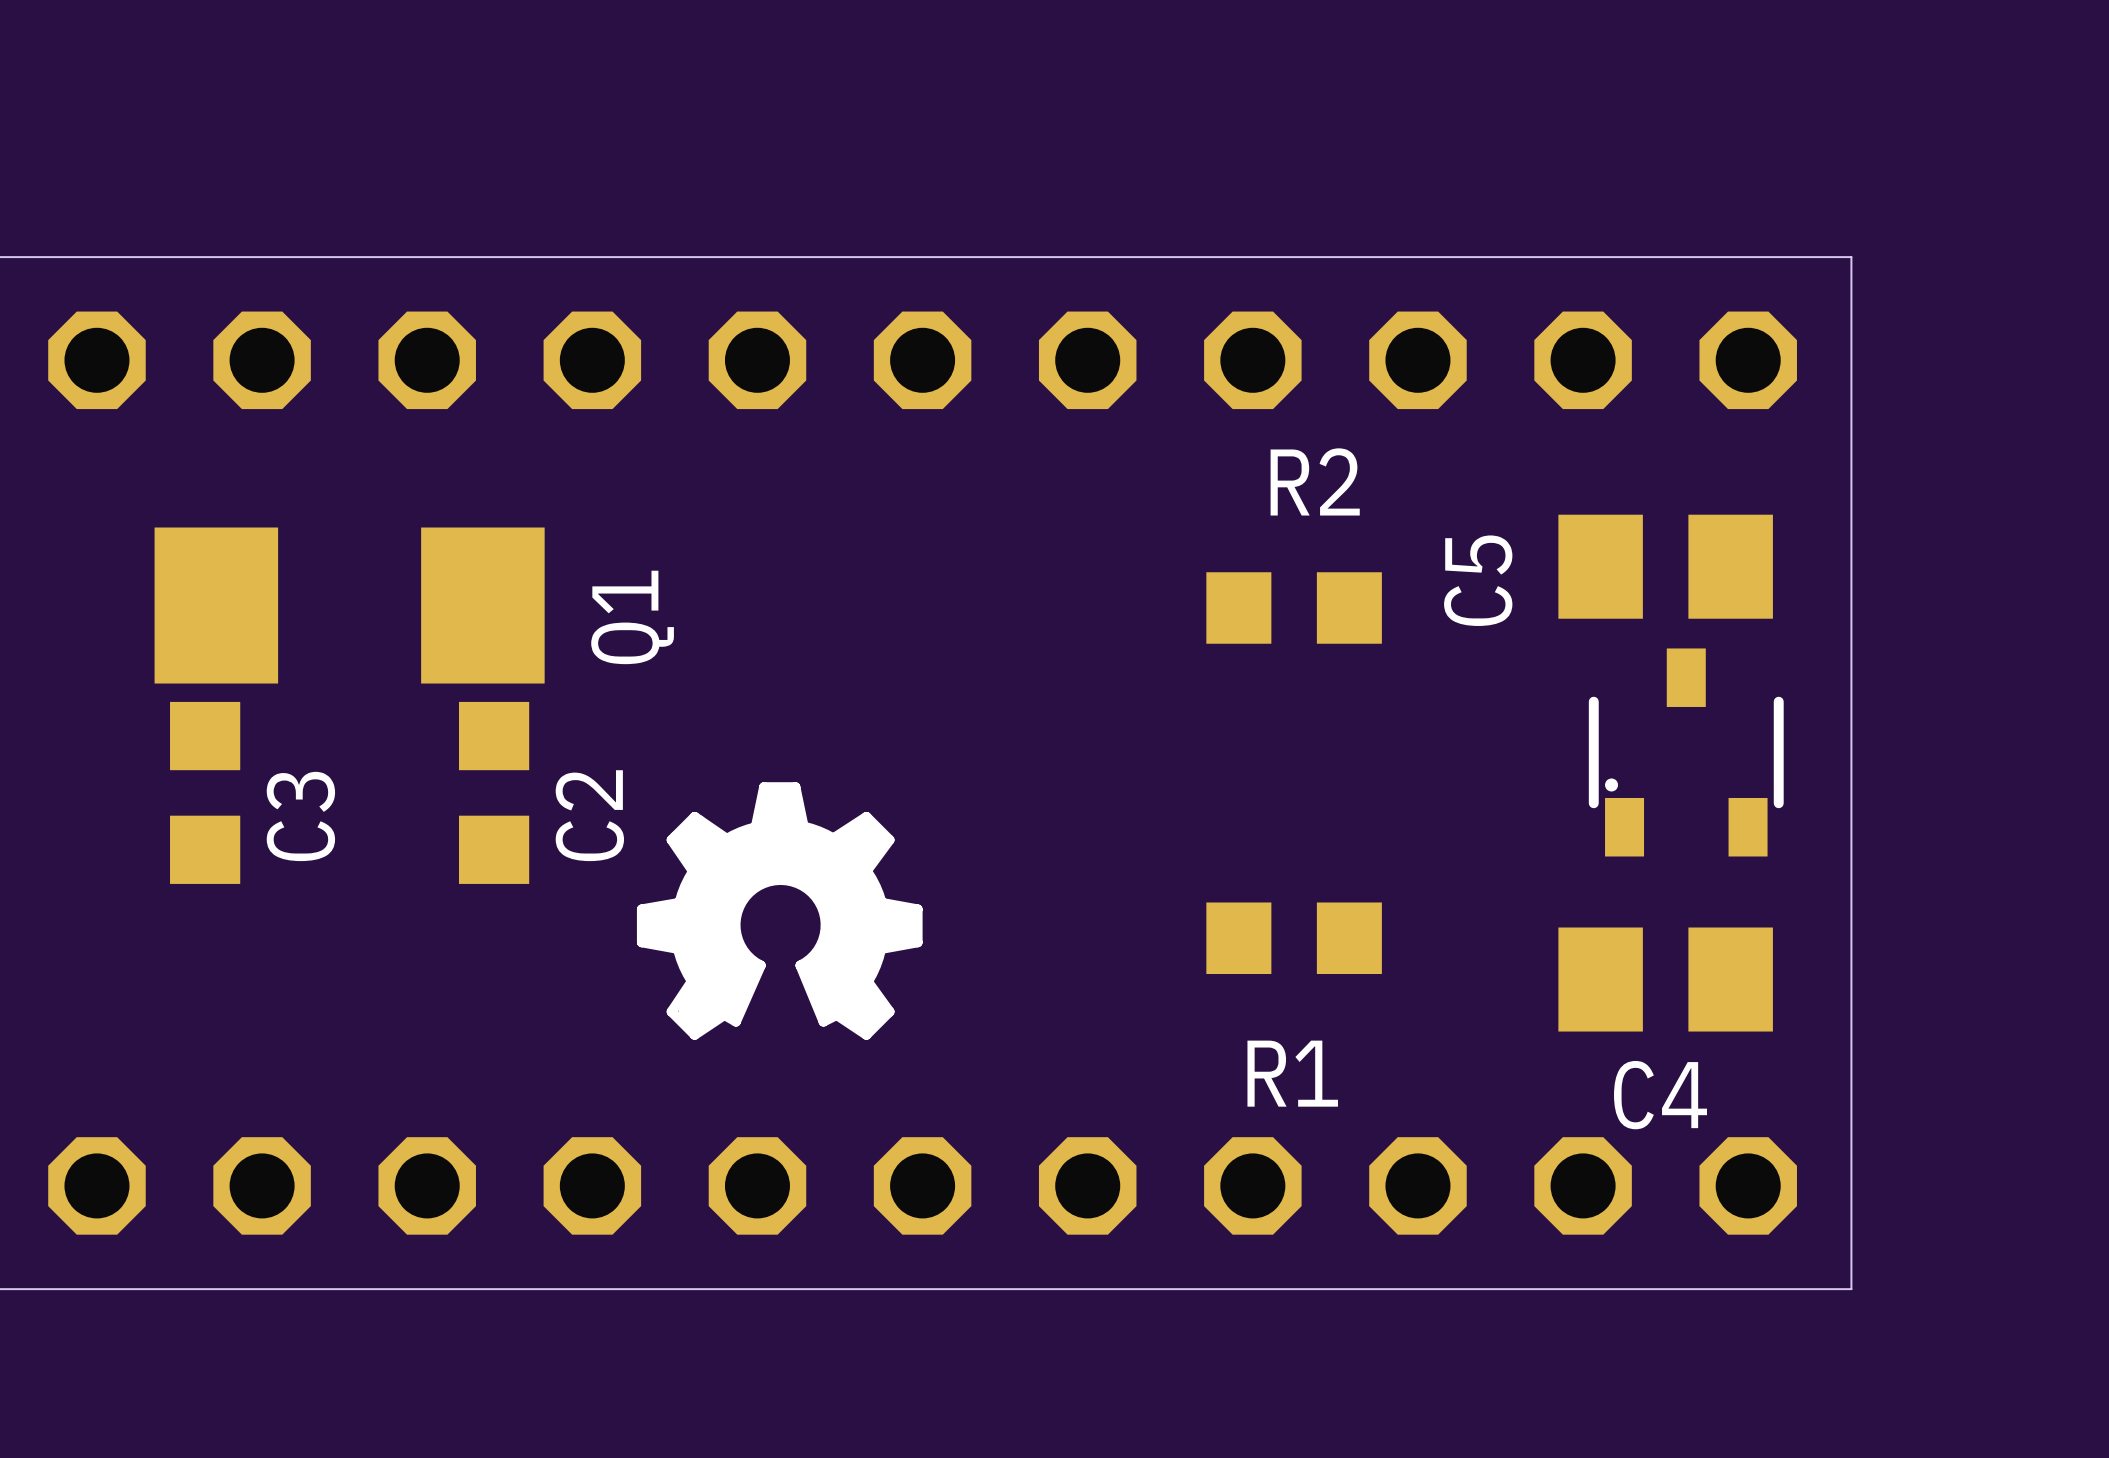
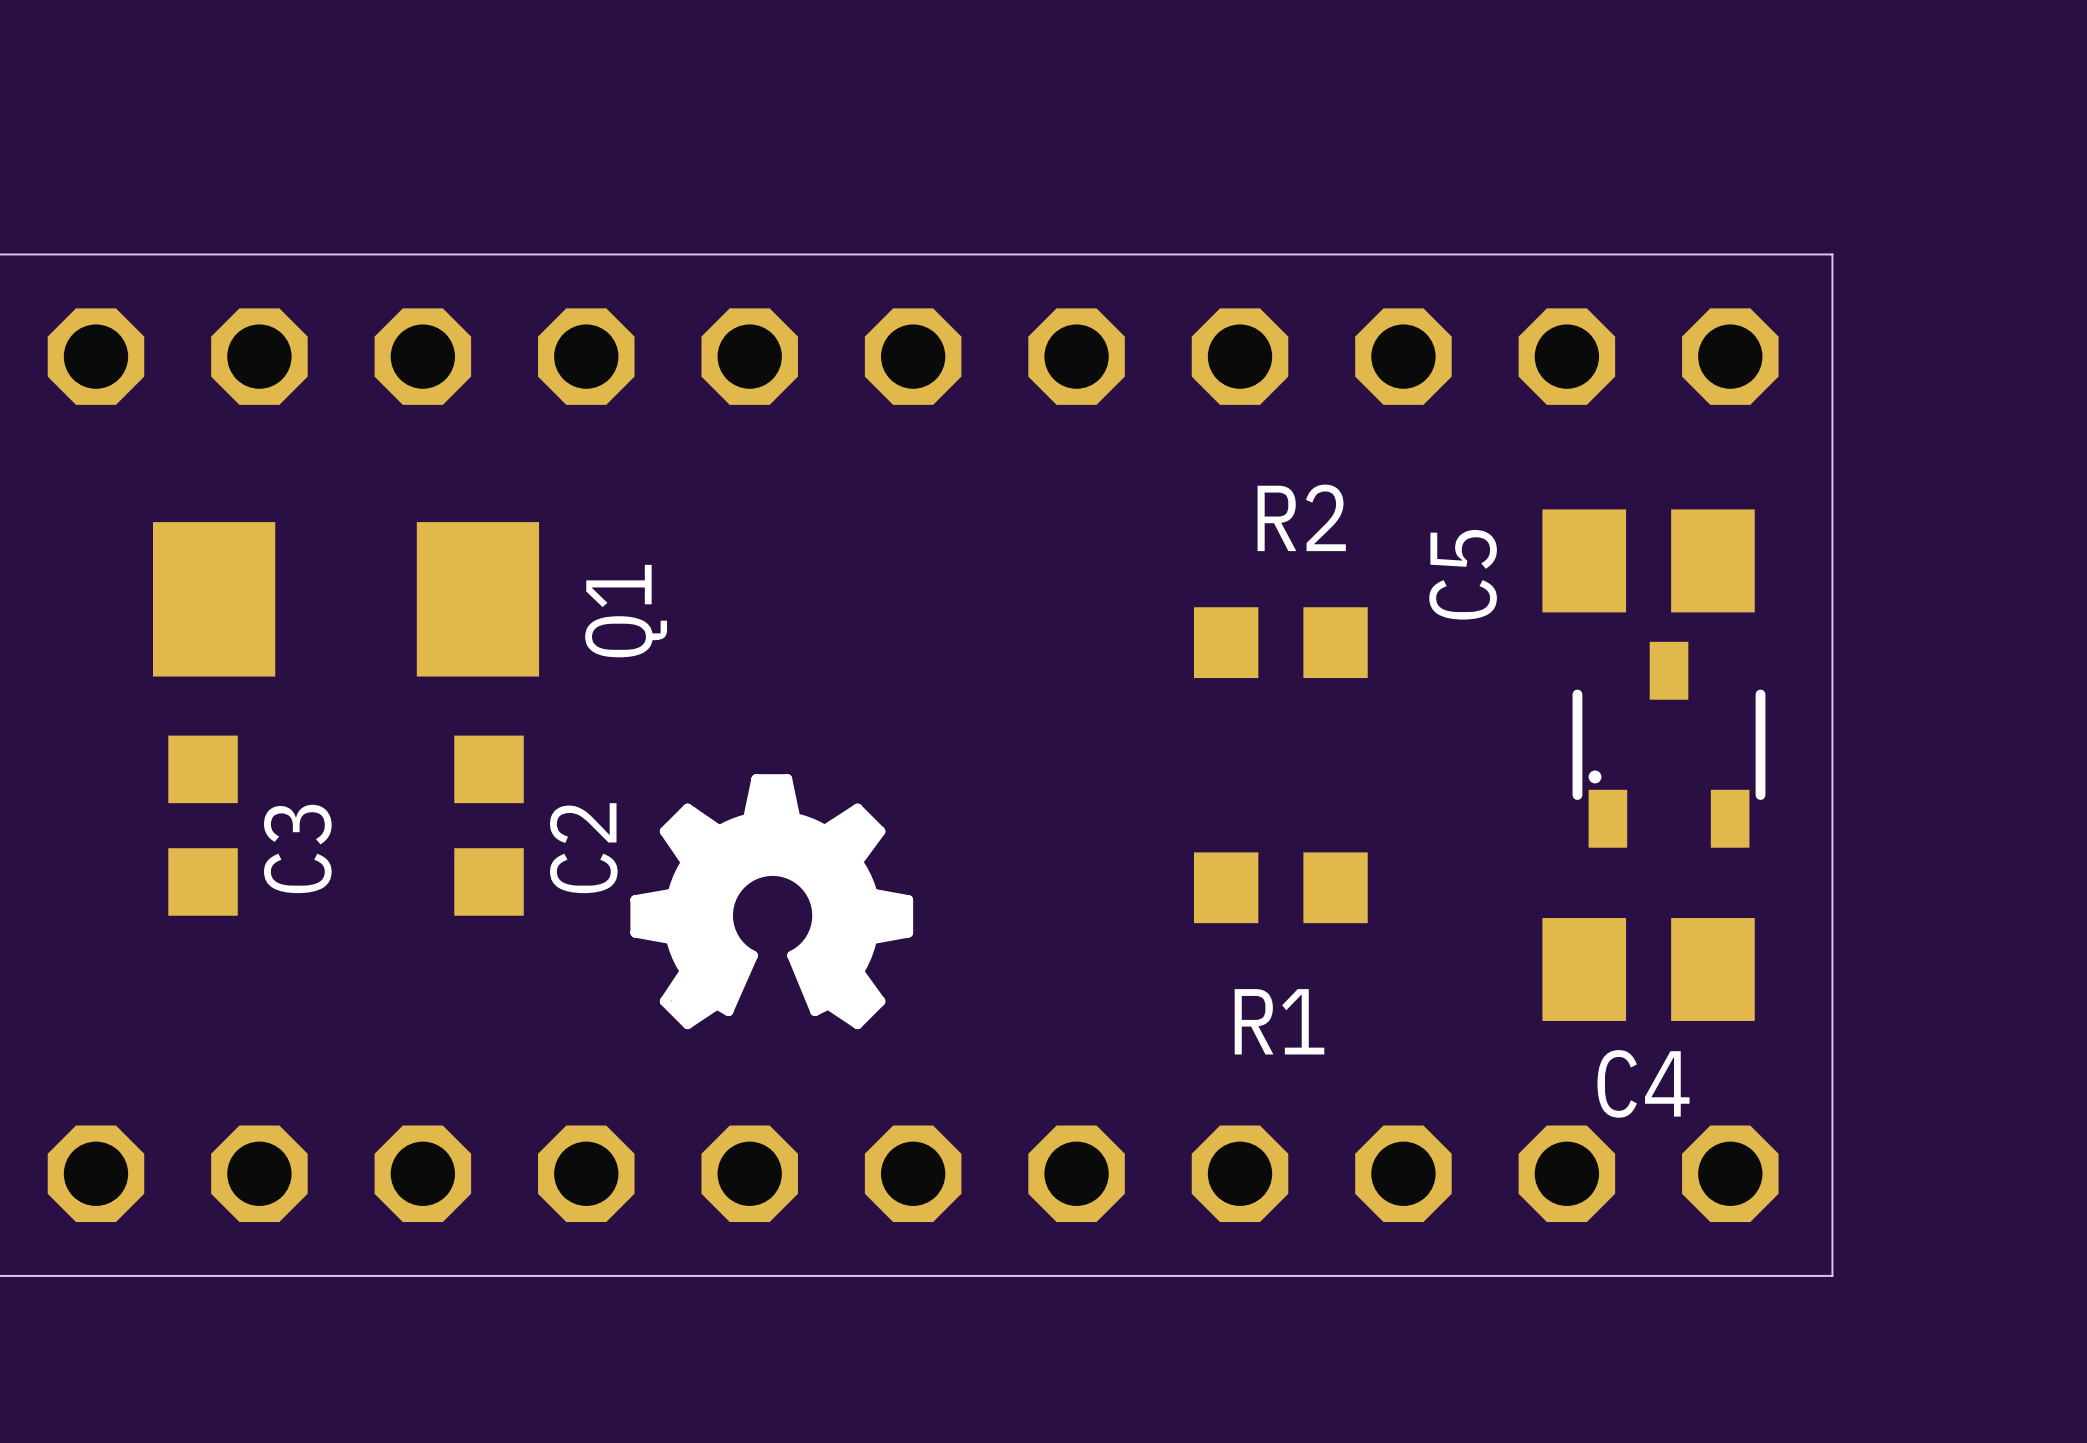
R2 position: (1294, 607) -> (1280, 642)
C3 position: (205, 792) -> (203, 825)
C2 position: (494, 792) -> (489, 825)
R1 position: (1294, 938) -> (1280, 887)

